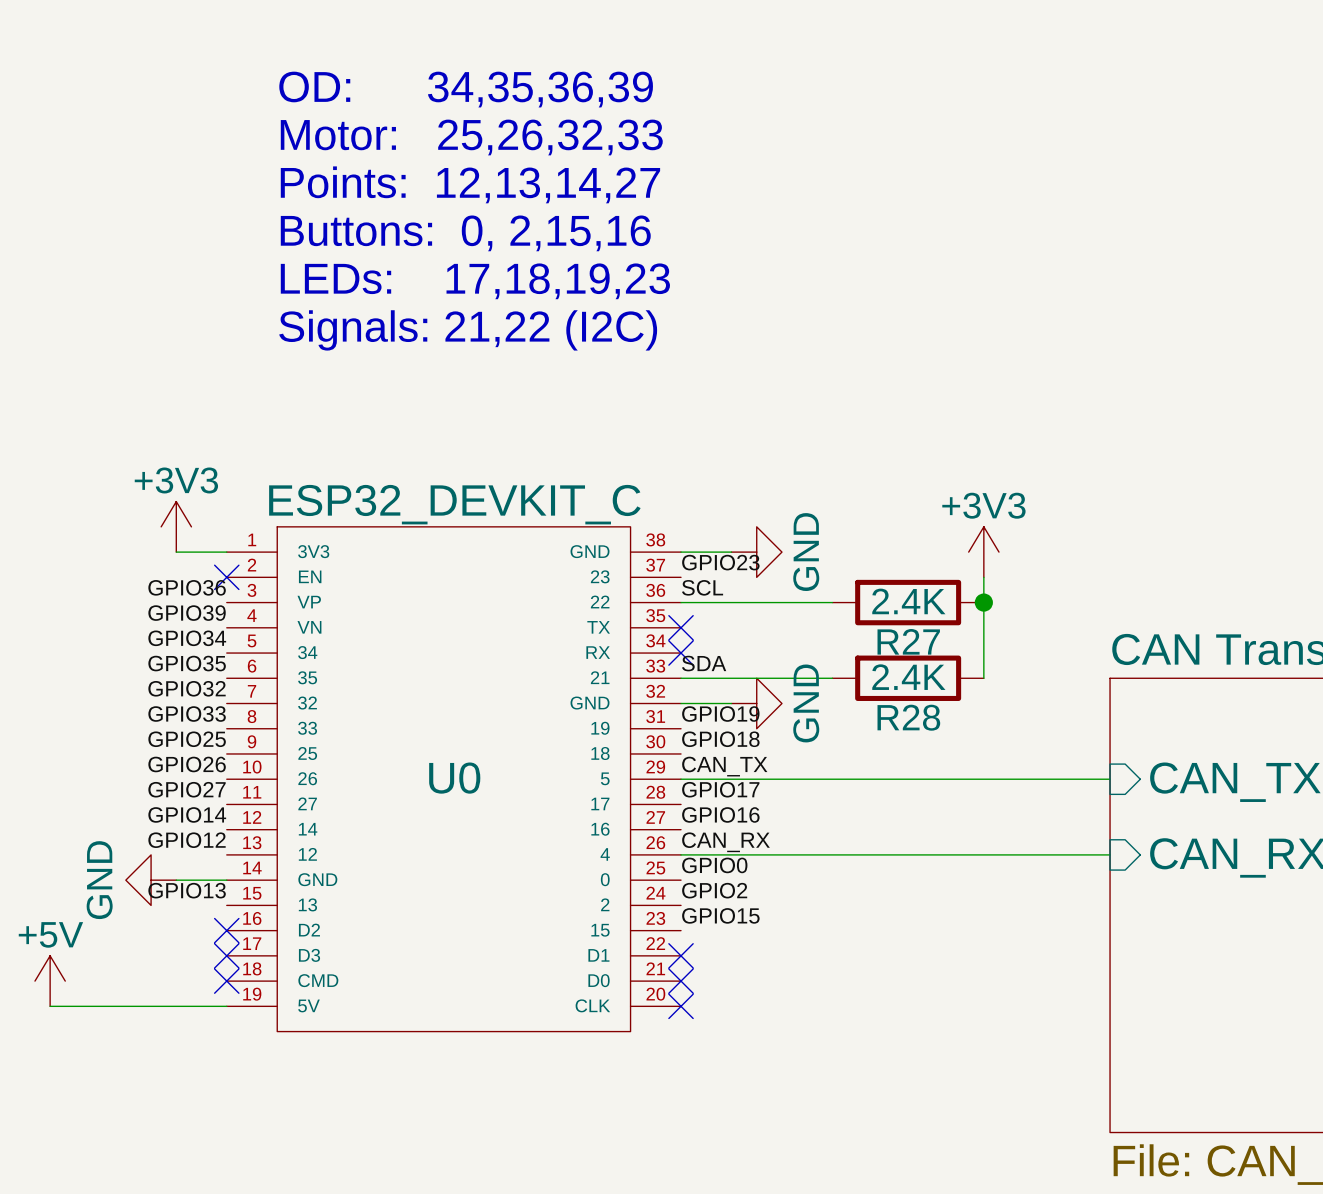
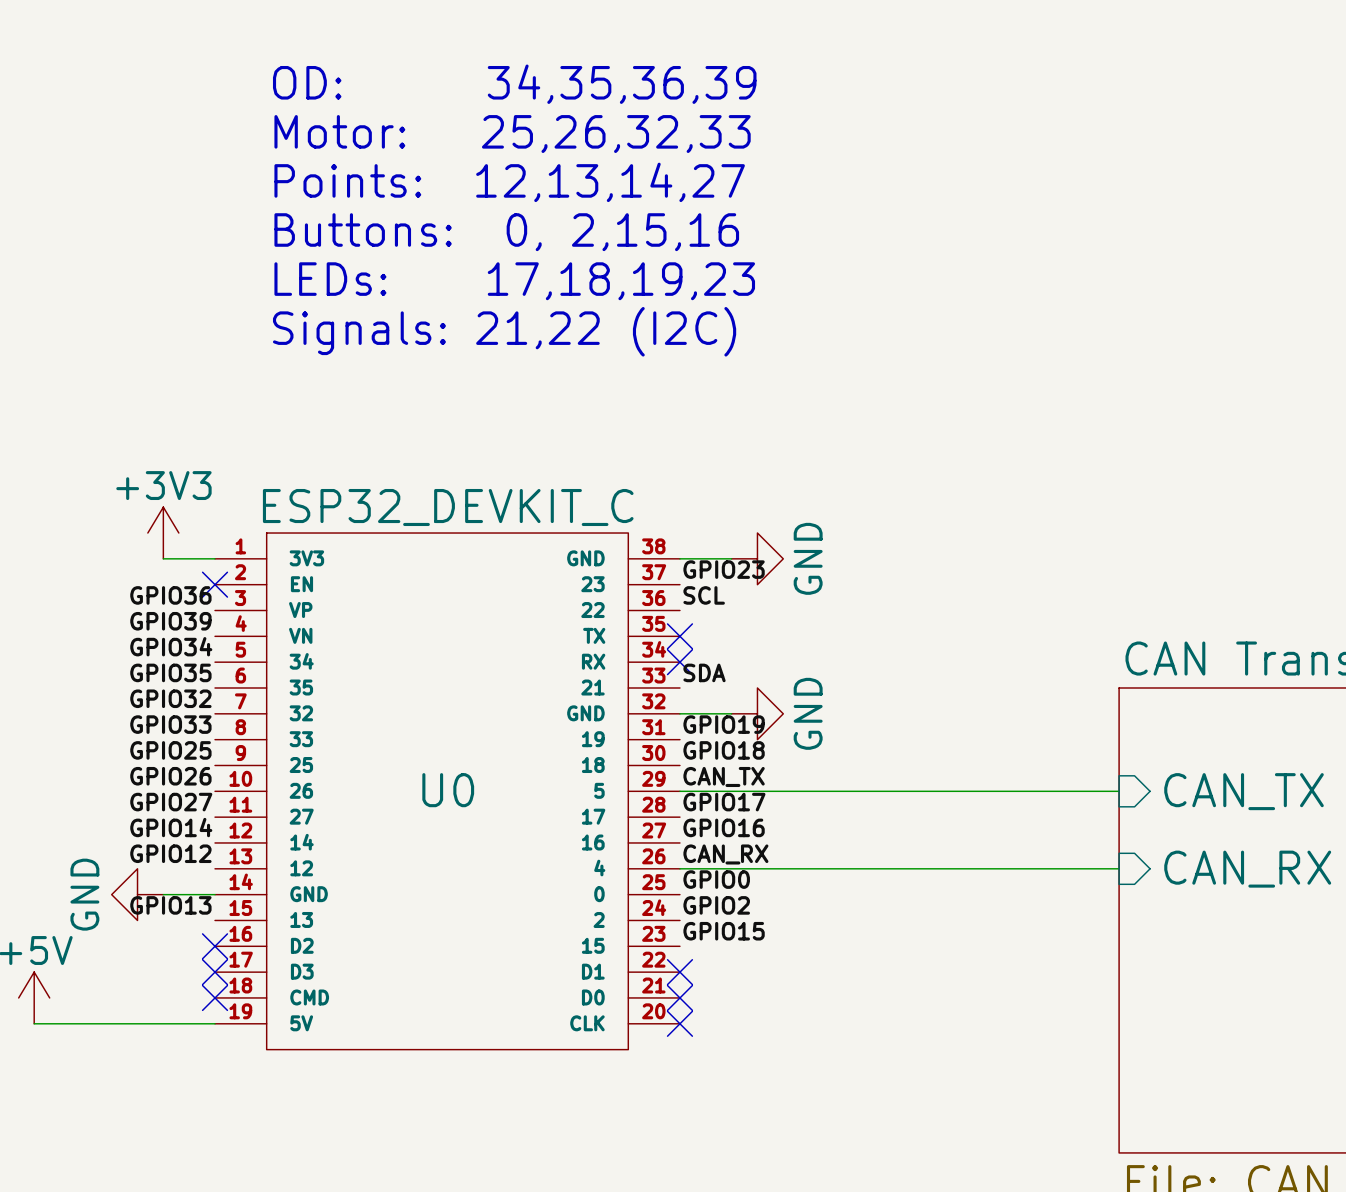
power symbol: +3V3 (983, 552) -> none
wire: (983, 577) (983, 678) -> none
wire: (681, 602) (832, 602) -> none
R27: 2.4K (908, 602) -> none
junction: (983, 602) -> none
wire: (681, 678) (832, 678) -> none
R28: 2.4K (908, 678) -> none

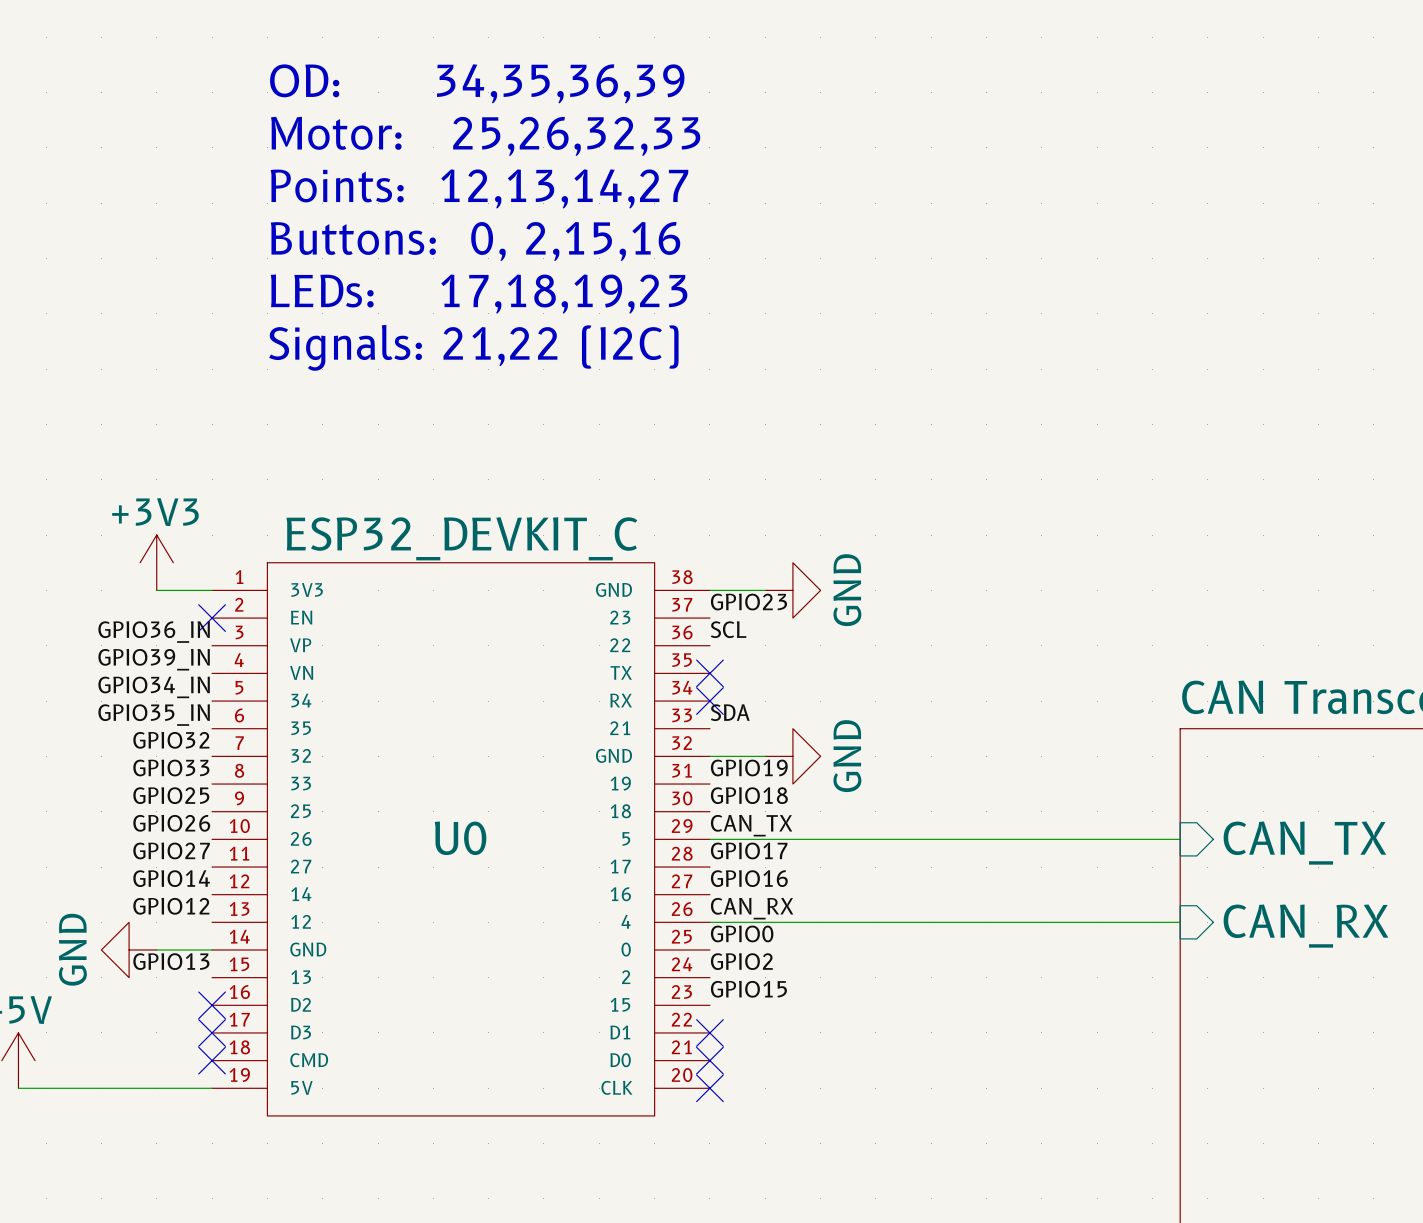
label: GPIO36 (170, 595) -> GPIO36_IN (154, 632)
label: GPIO39 (170, 621) -> GPIO39_IN (154, 659)
label: GPIO34 (171, 646) -> GPIO34_IN (154, 687)
label: GPIO35 (170, 672) -> GPIO35_IN (154, 715)

